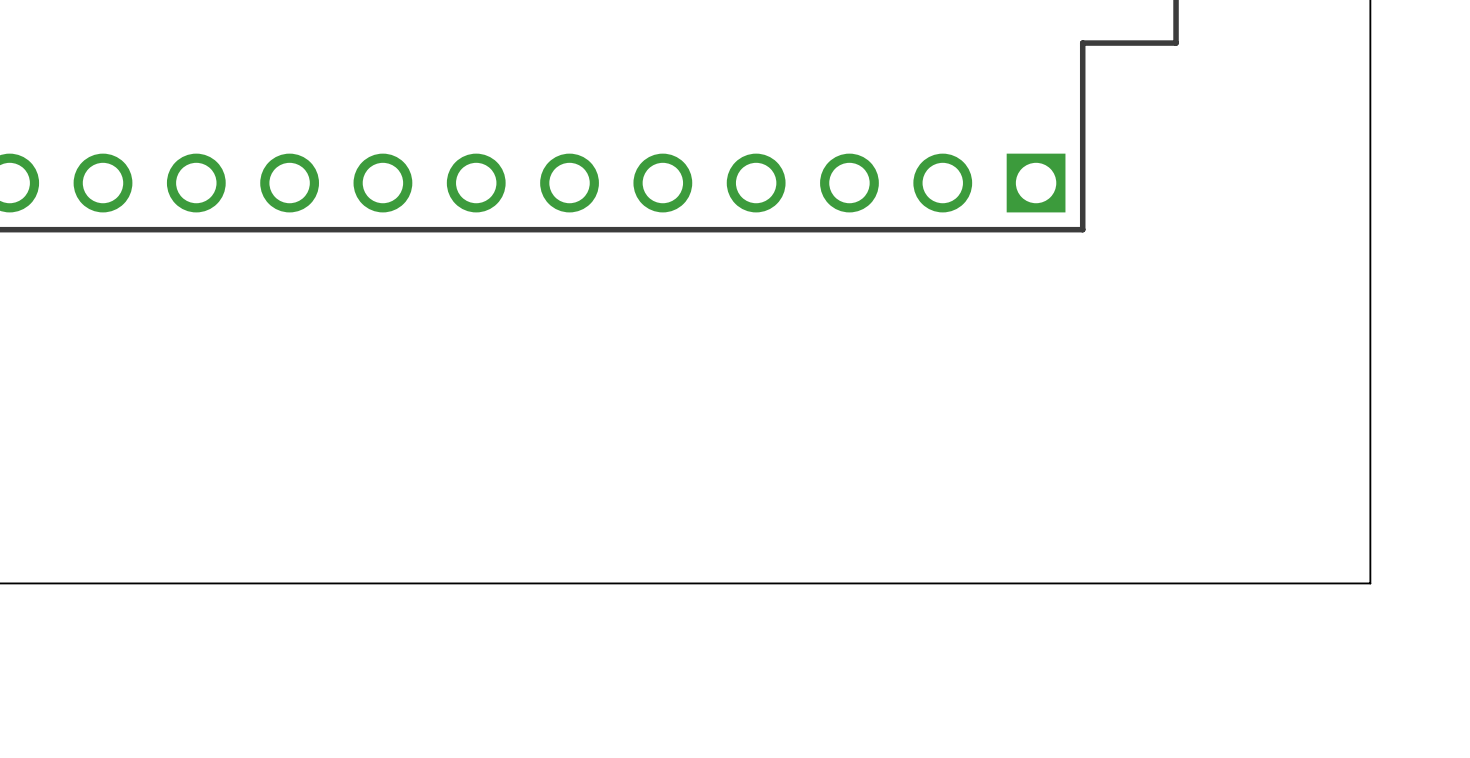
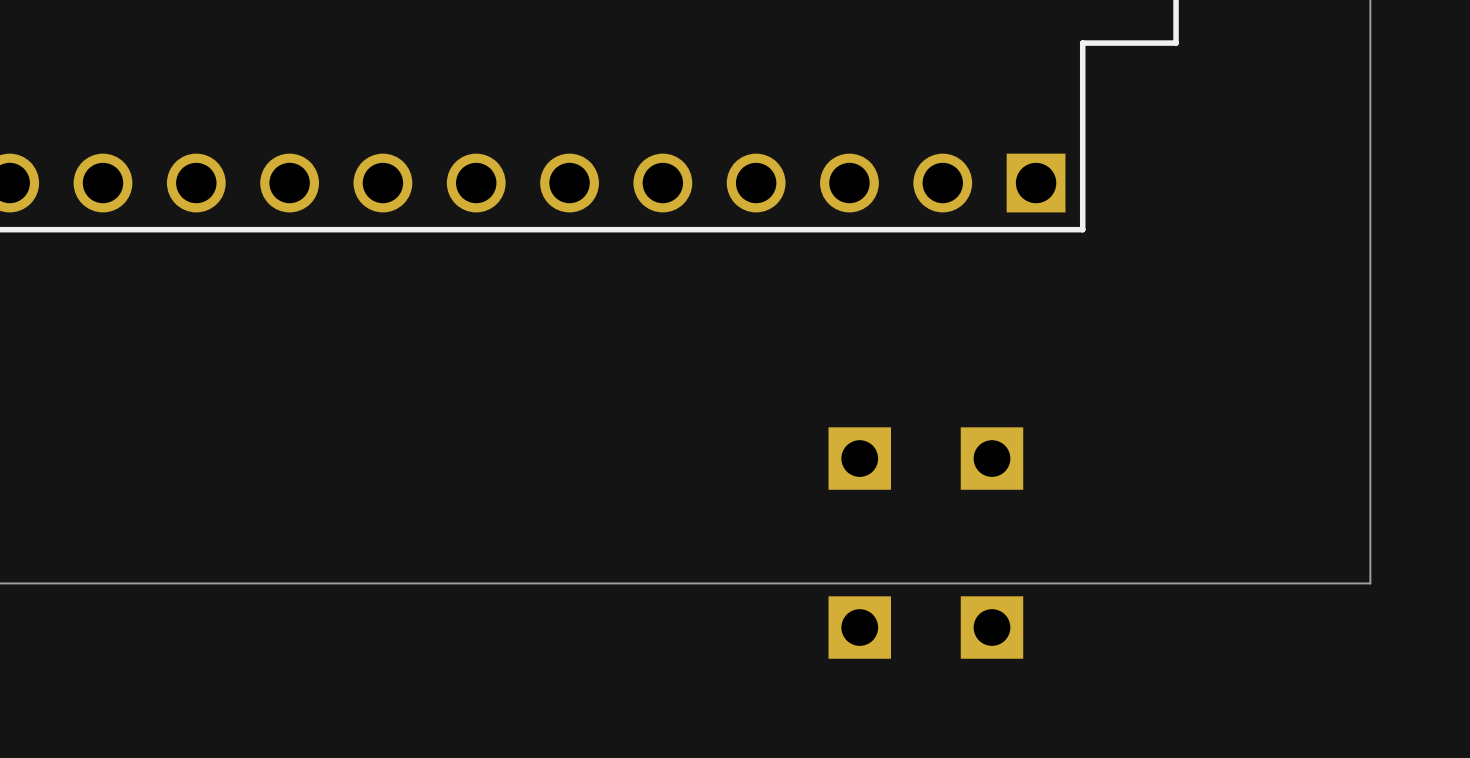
part: none -> (859, 458)
part: none -> (991, 458)
part: none -> (859, 627)
part: none -> (991, 627)

